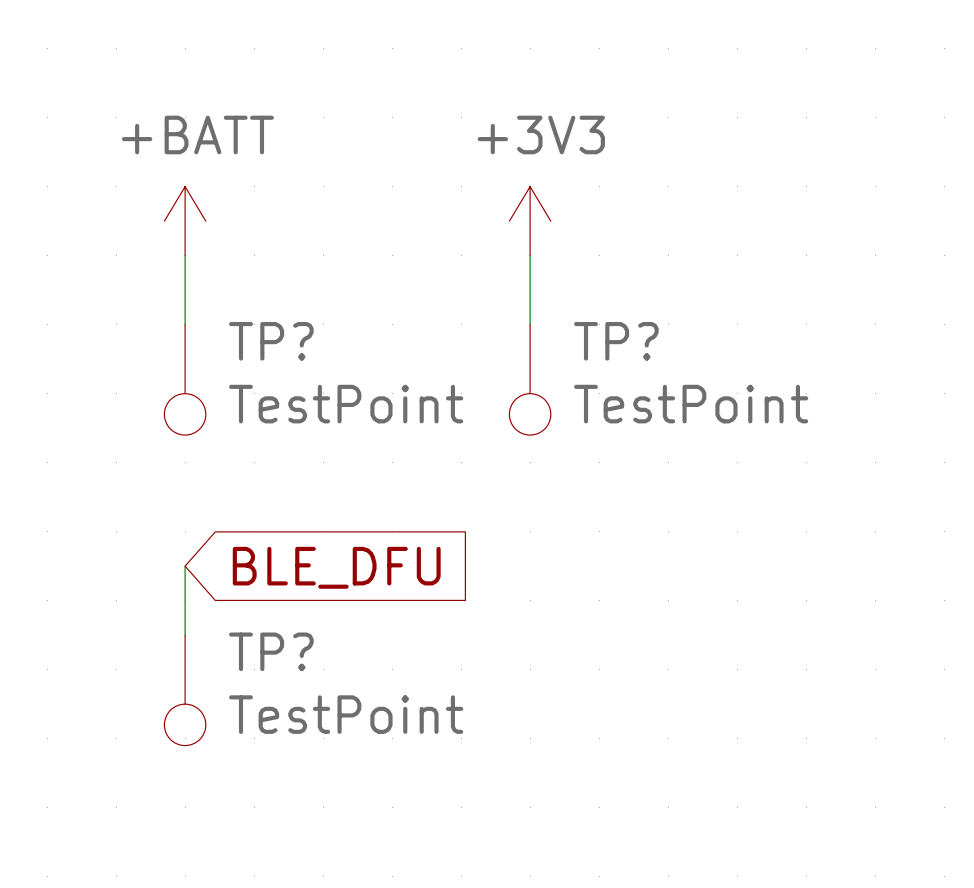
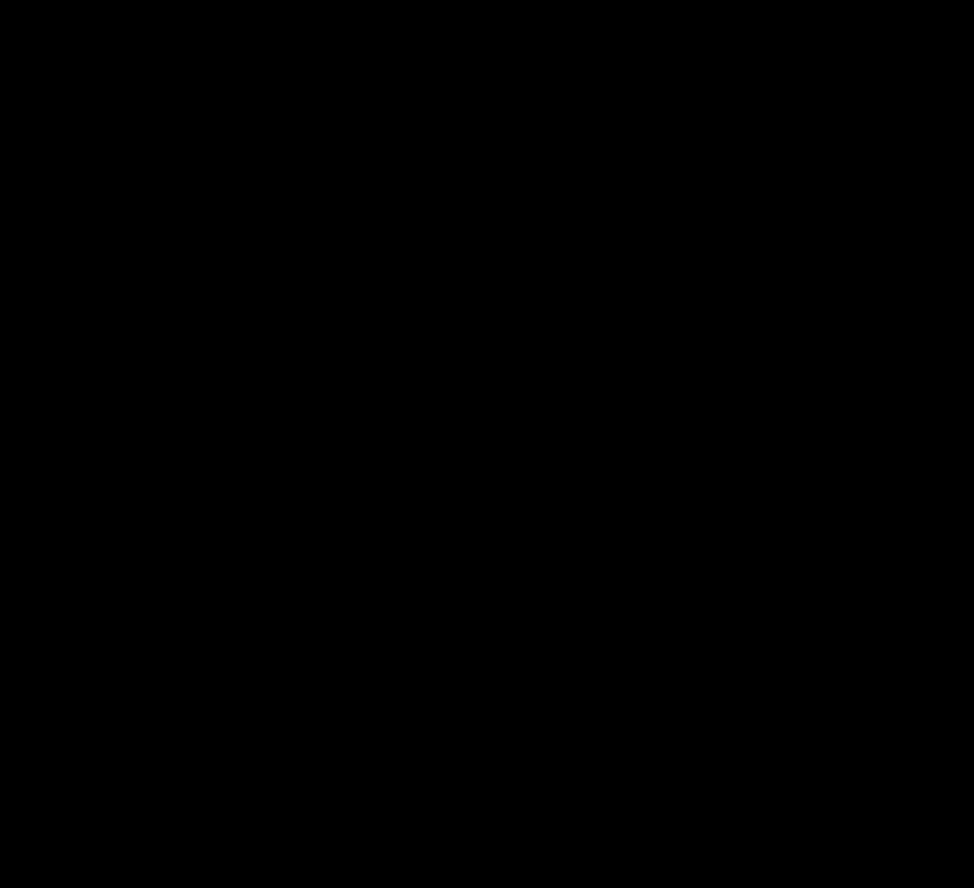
power symbol: +BATT (185, 221) -> none
power symbol: +3V3 (530, 221) -> none
wire: (185, 255) (185, 324) -> none
wire: (530, 255) (530, 324) -> none
TP?: TestPoint (185, 379) -> none
TP?: TestPoint (530, 379) -> none
wire: (185, 566) (185, 635) -> none
global label: BLE_DFU (336, 567) -> none
TP?: TestPoint (185, 690) -> none

